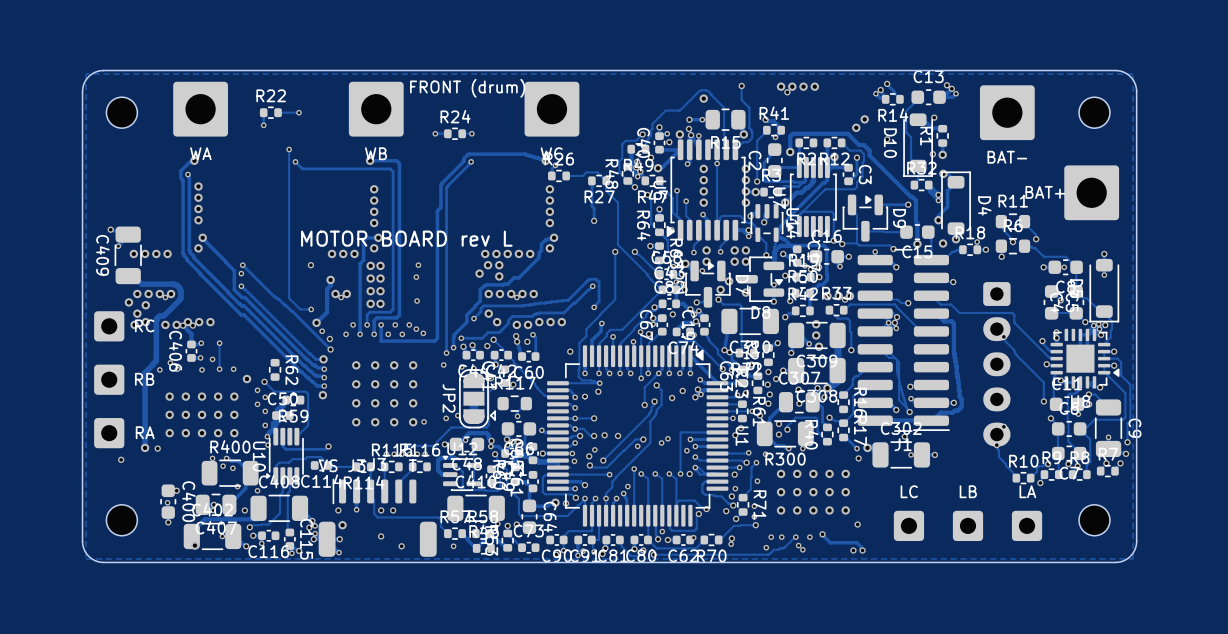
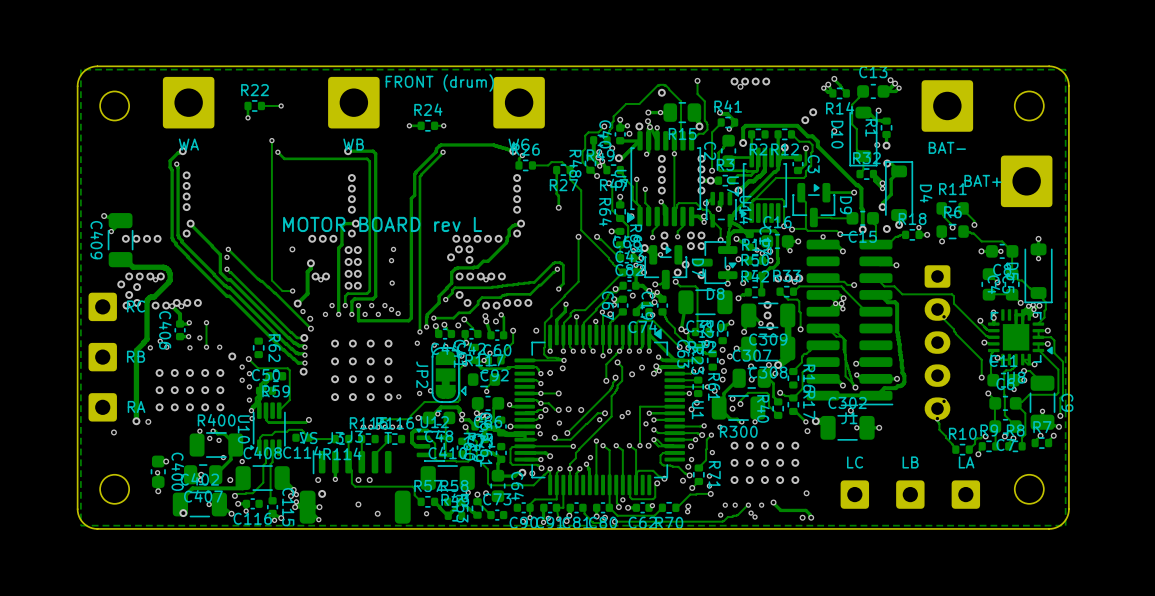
track: none -> (513, 330) (513, 342) (504, 351) (504, 357) (500, 360)
track: (508, 355) (544, 395) (557, 397) -> none
via: none -> (490, 353)
via: none -> (484, 360)
C92: none -> (494, 360)
via position: (513, 384) -> (513, 330)
track: none -> (524, 367) (507, 367) (506, 368) (482, 368) (474, 360) (481, 369) (509, 369) (511, 367)
via: (589, 456) -> none

